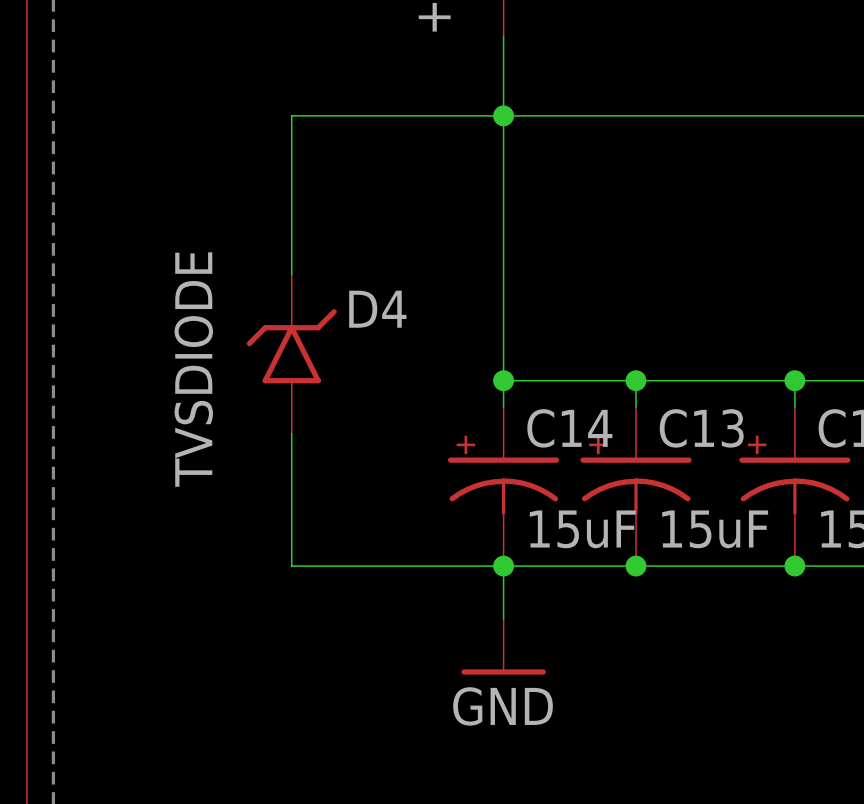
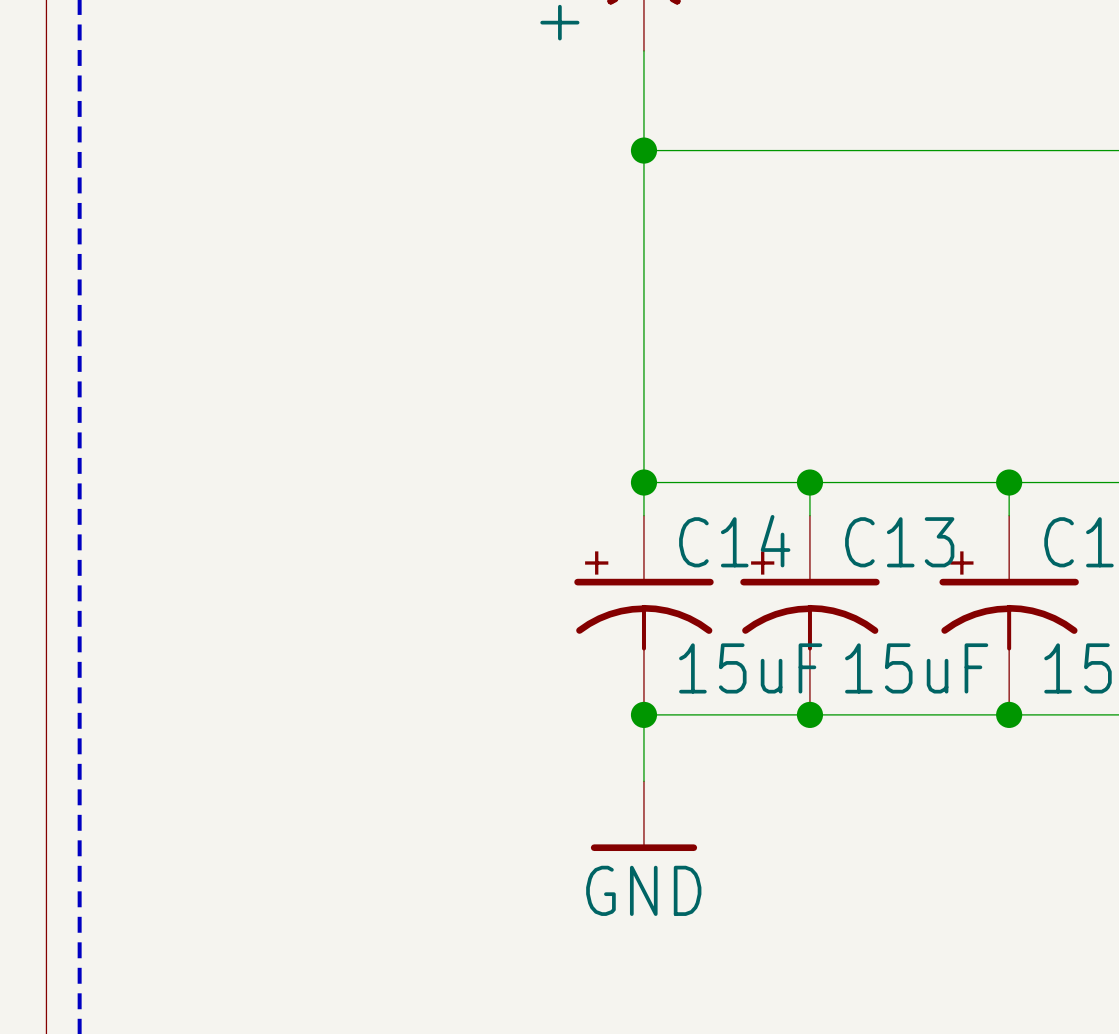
wire: (503, 115) (291, 115) (291, 274) -> none
D4: TVSDIODE (291, 354) -> none
wire: (291, 433) (291, 566) (503, 566) -> none

